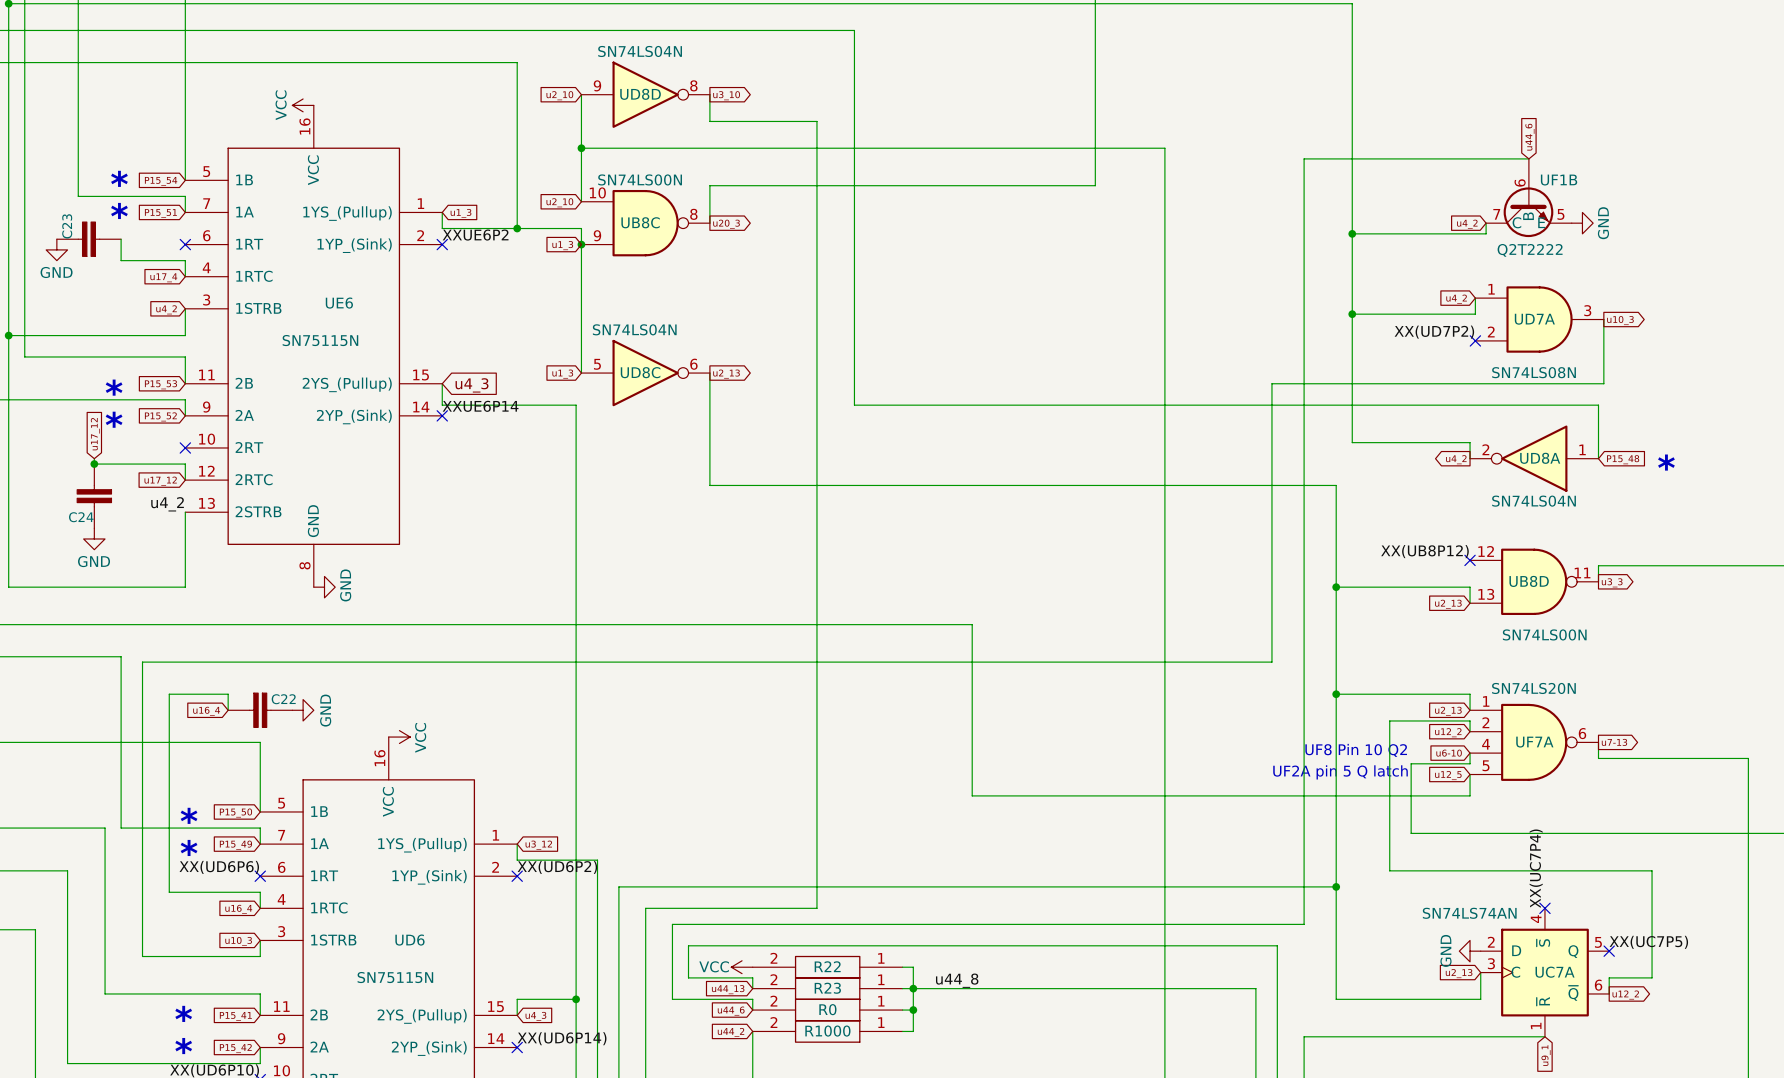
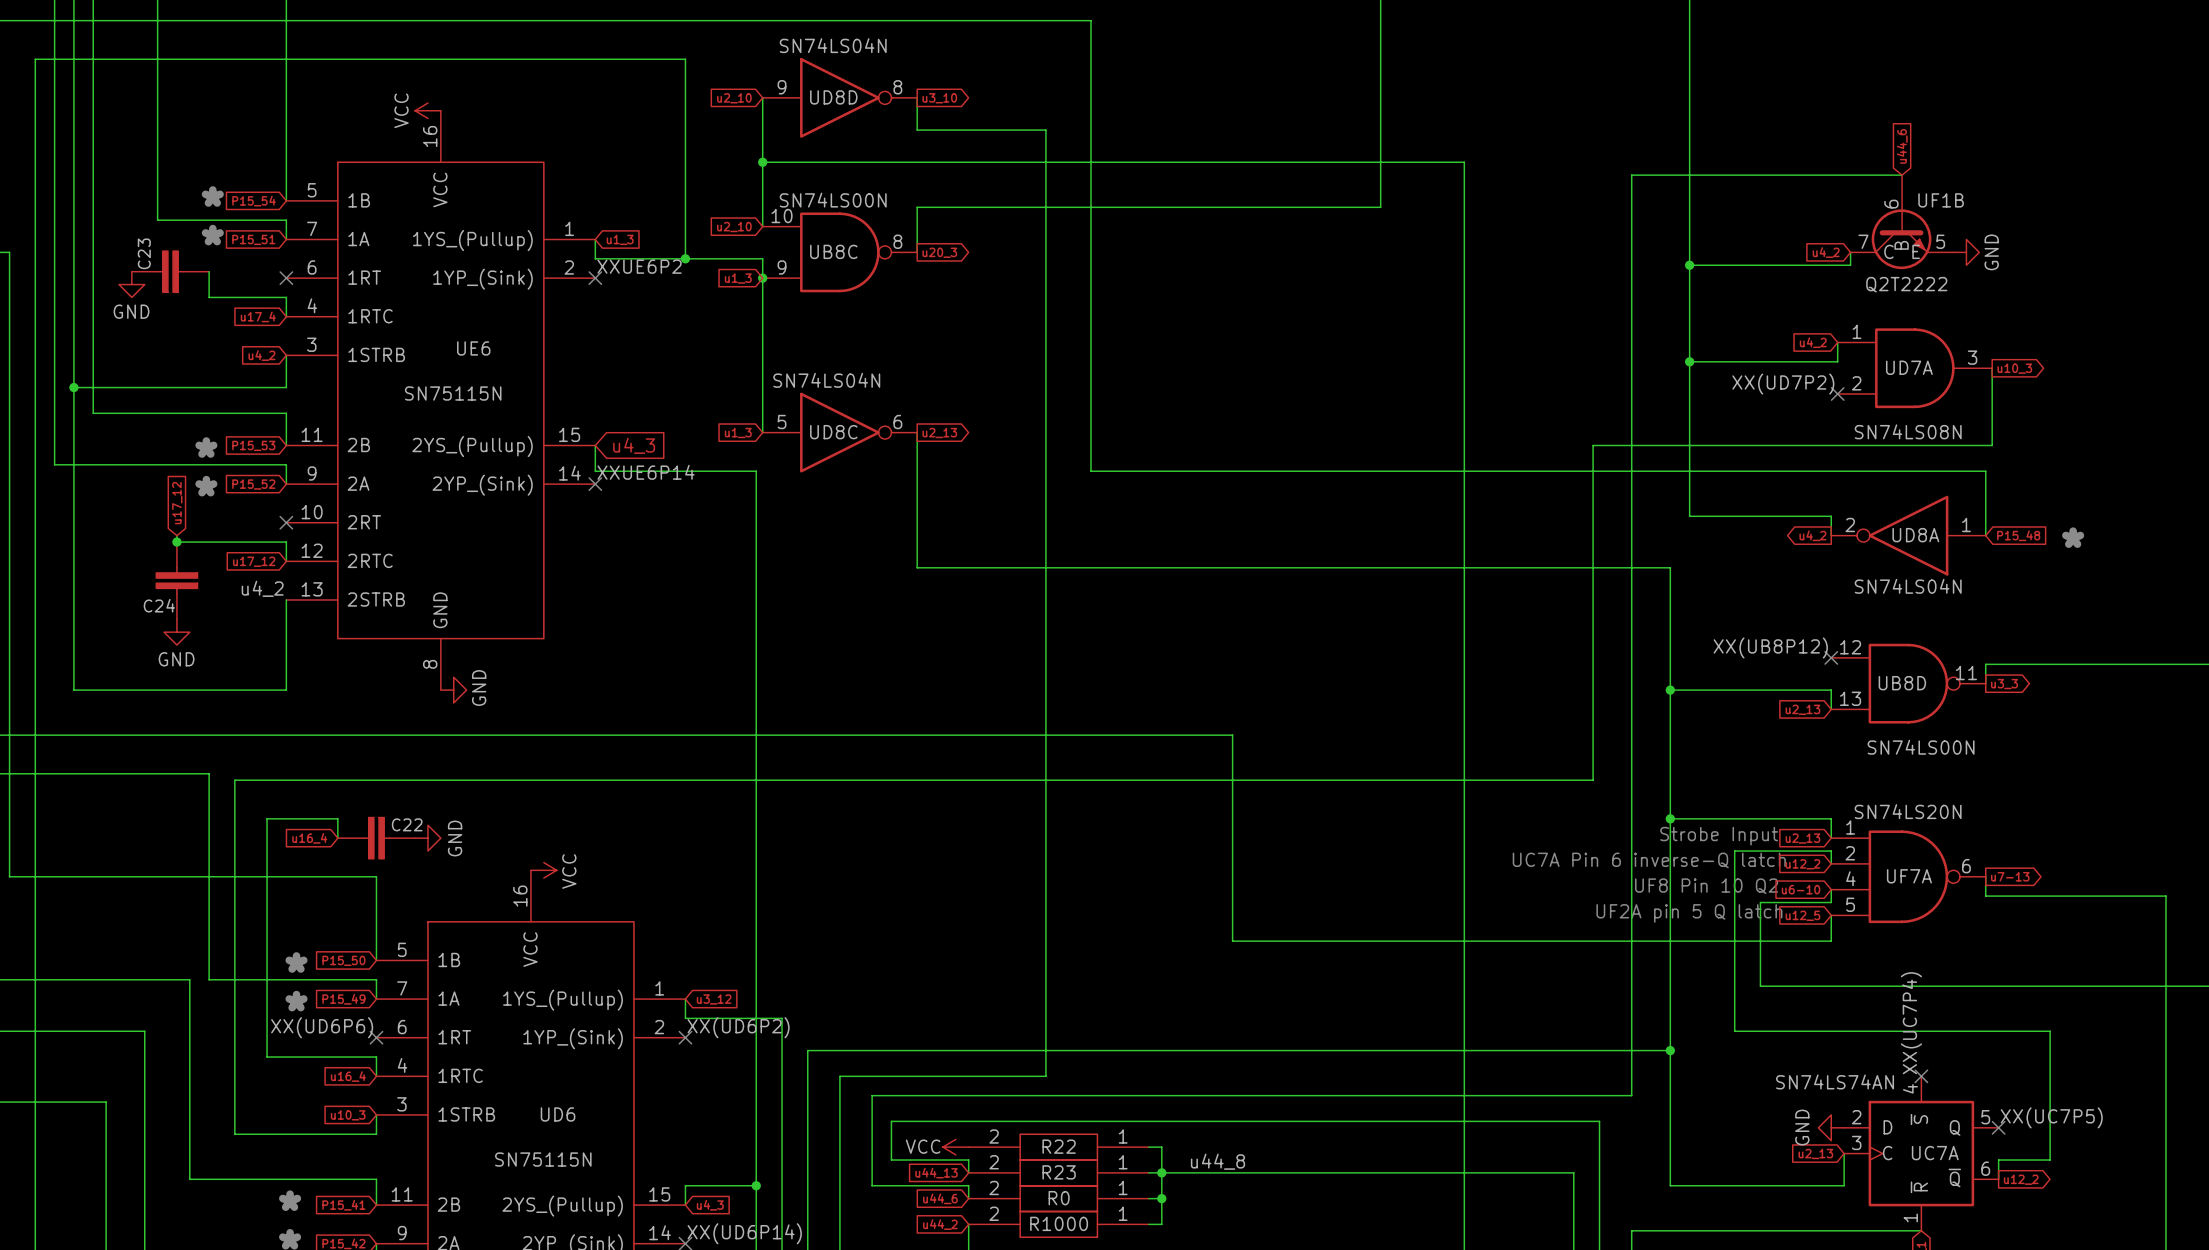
text: none -> Strobe Input (1719, 836)
text: none -> UC7A Pin 6 inverse-Q latch (1649, 860)

